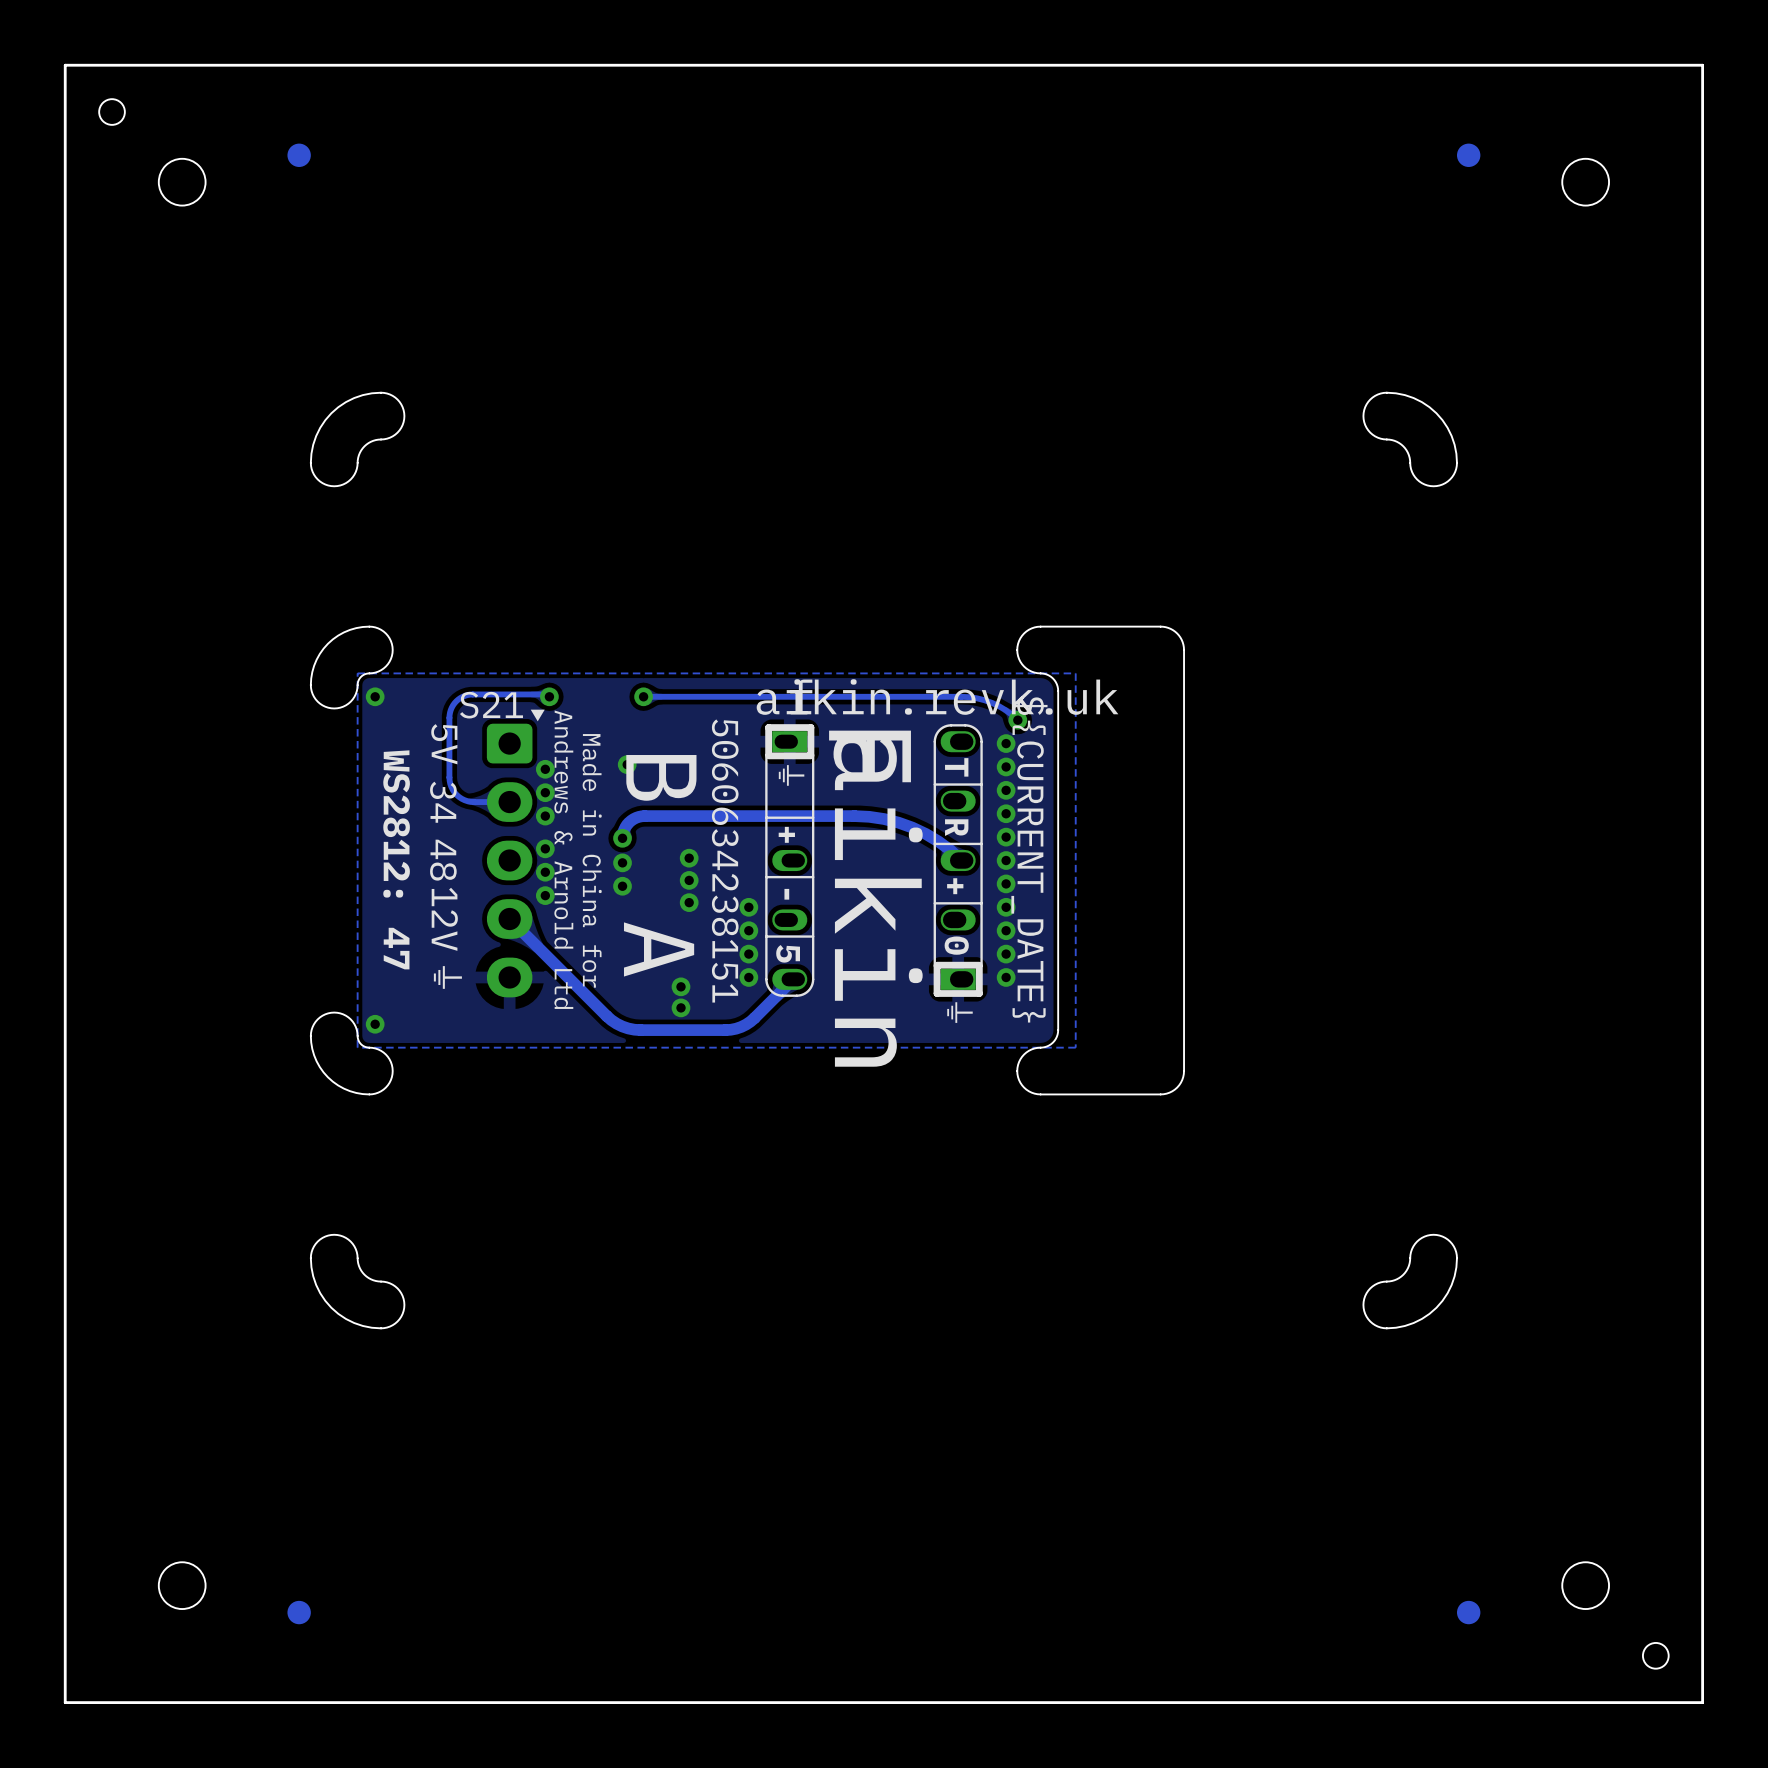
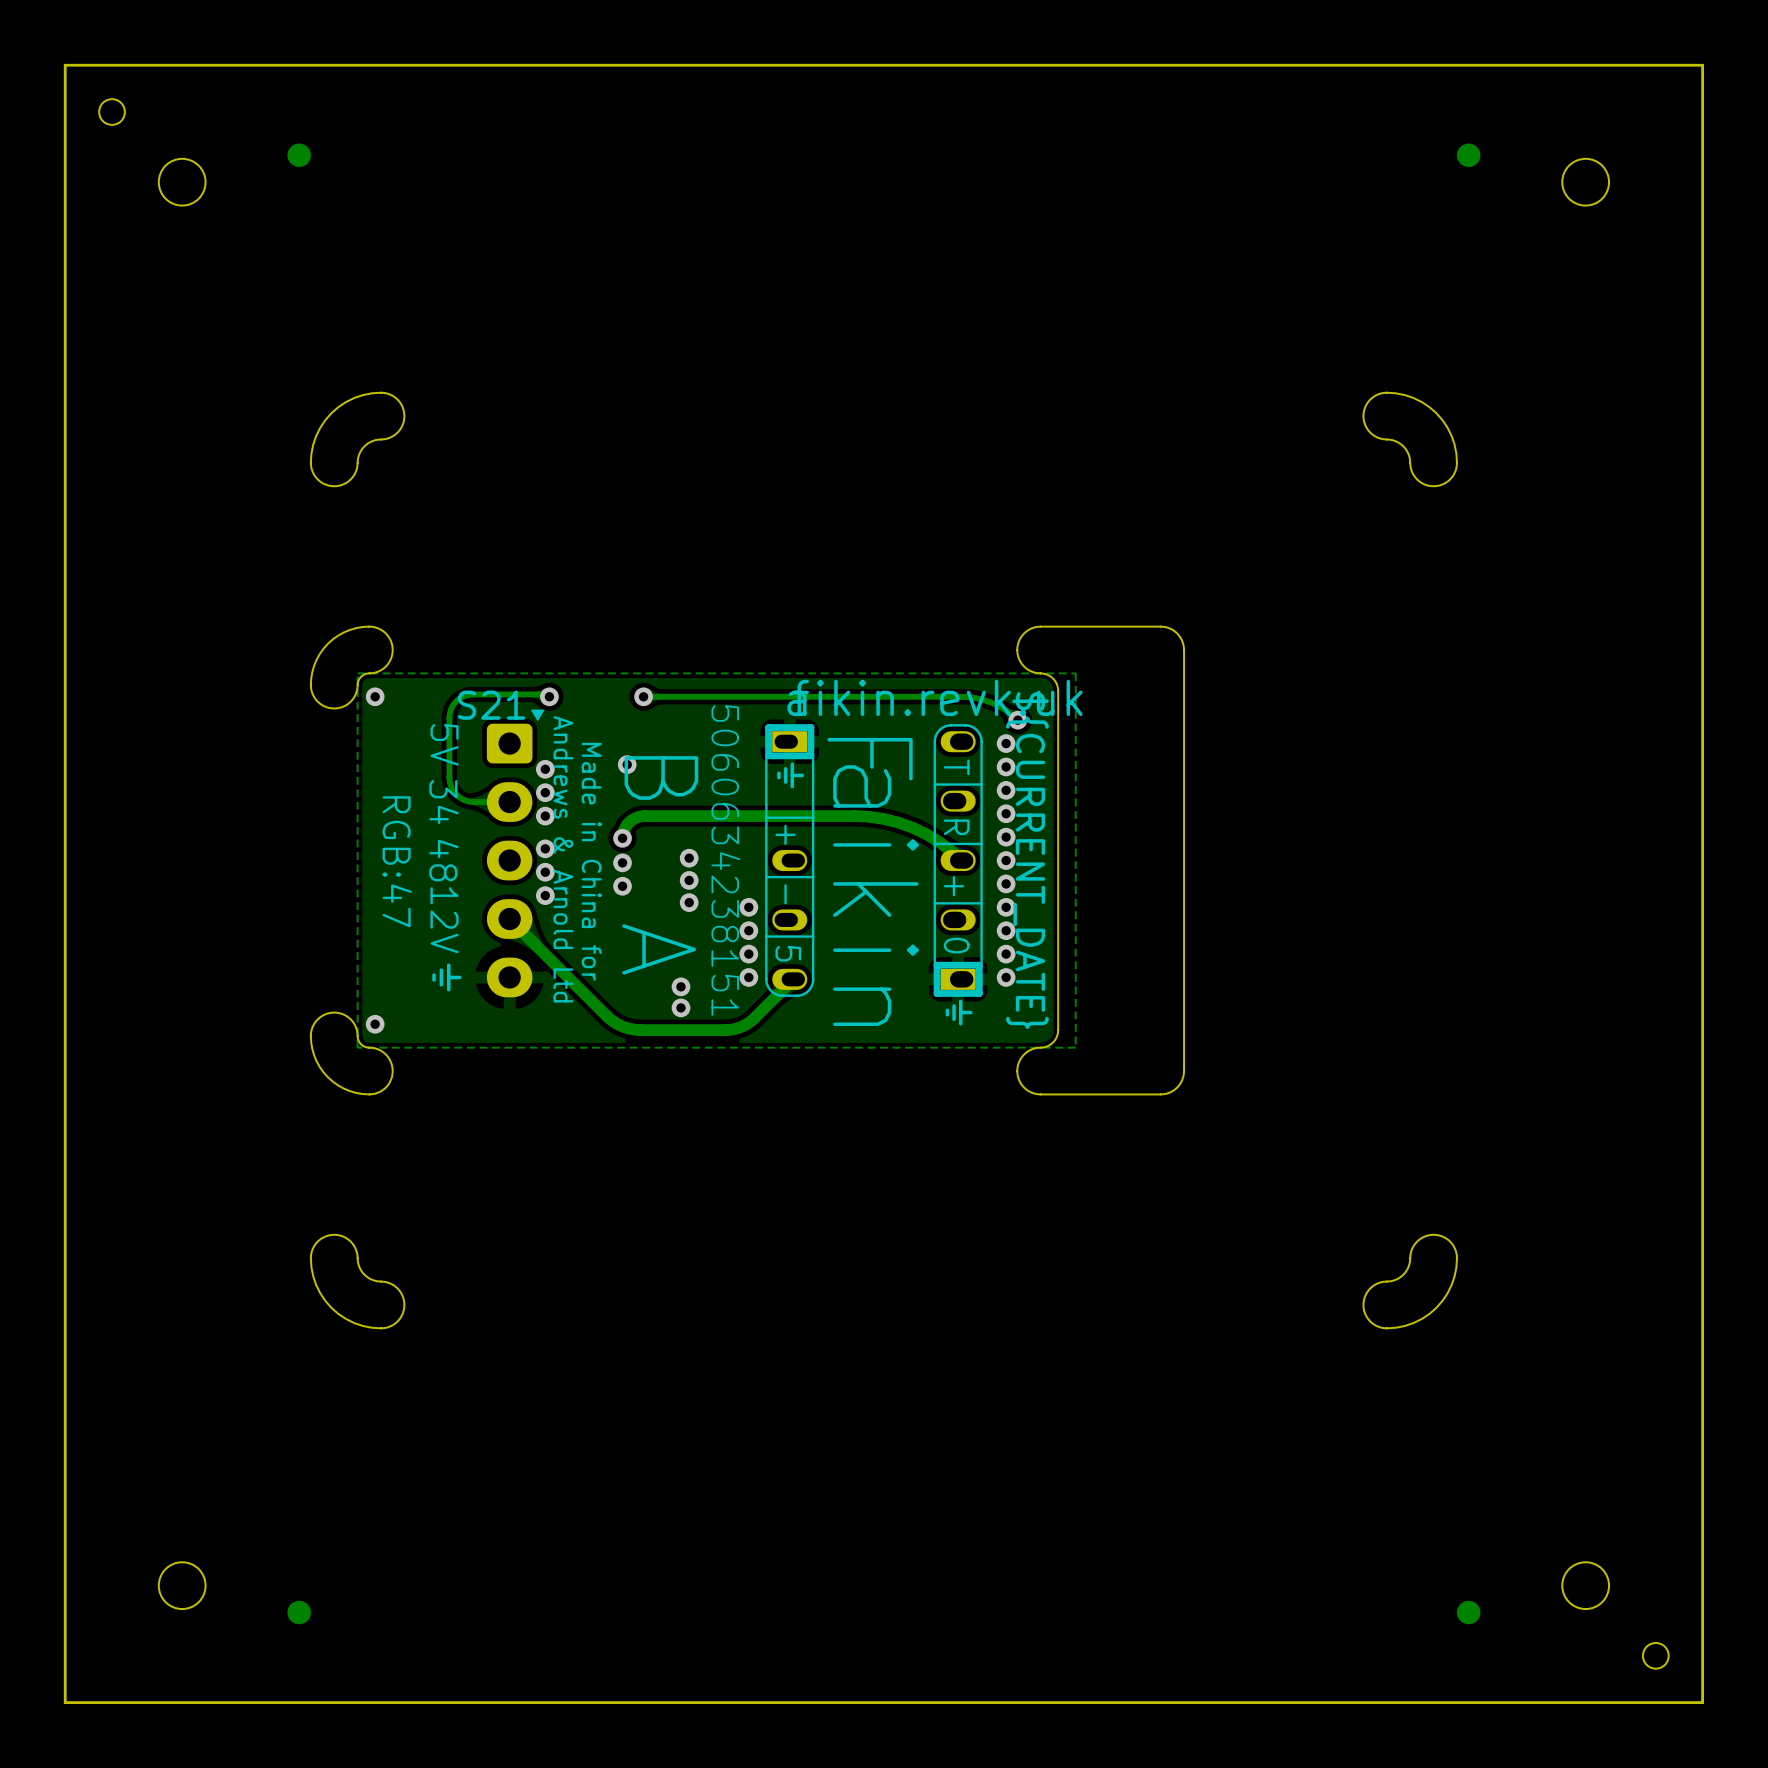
text: WS2812: 47 (396, 859) -> RGB:47 (397, 861)

